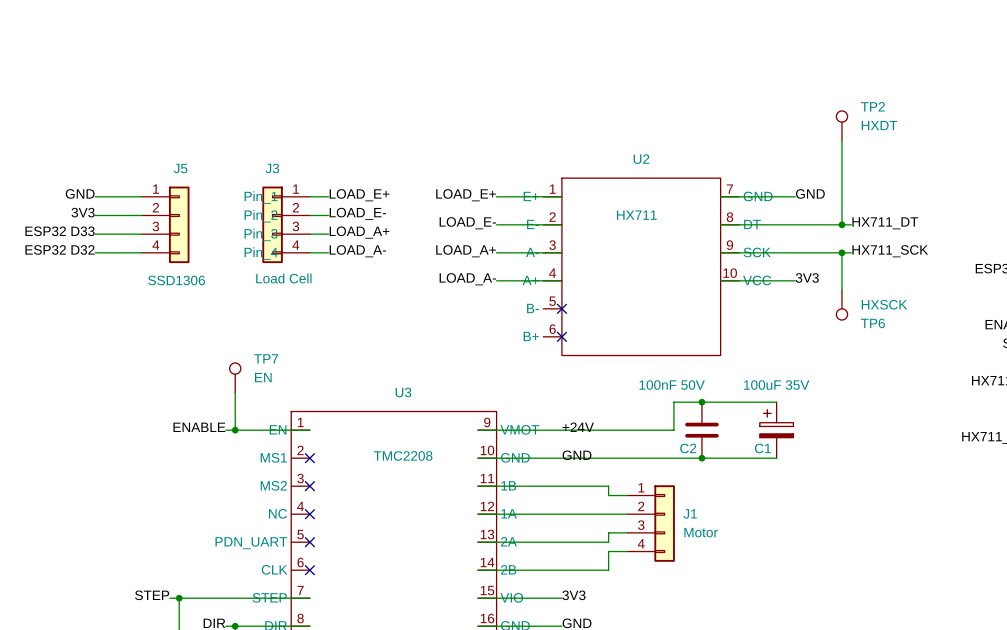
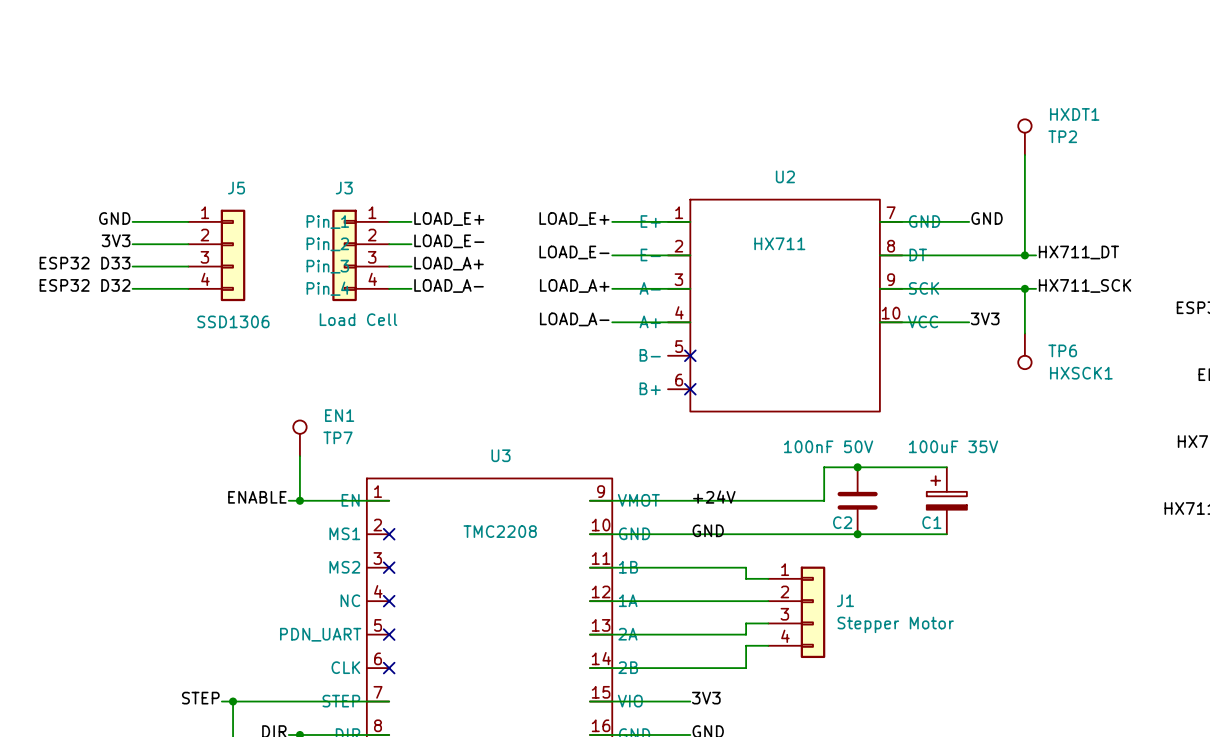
TP2 name: TP2 (872, 106) -> HXDT1 (1074, 114)
TP2 value: HXDT (879, 125) -> TP2 (1062, 136)
TP6 value: HXSCK (884, 304) -> TP6 (1062, 350)
TP6 name: TP6 (872, 323) -> HXSCK1 (1081, 373)
TP7 name: TP7 (266, 358) -> EN1 (339, 415)
TP7 value: EN (263, 377) -> TP7 (338, 437)
J1 value: Motor (701, 532) -> Stepper Motor (895, 624)

